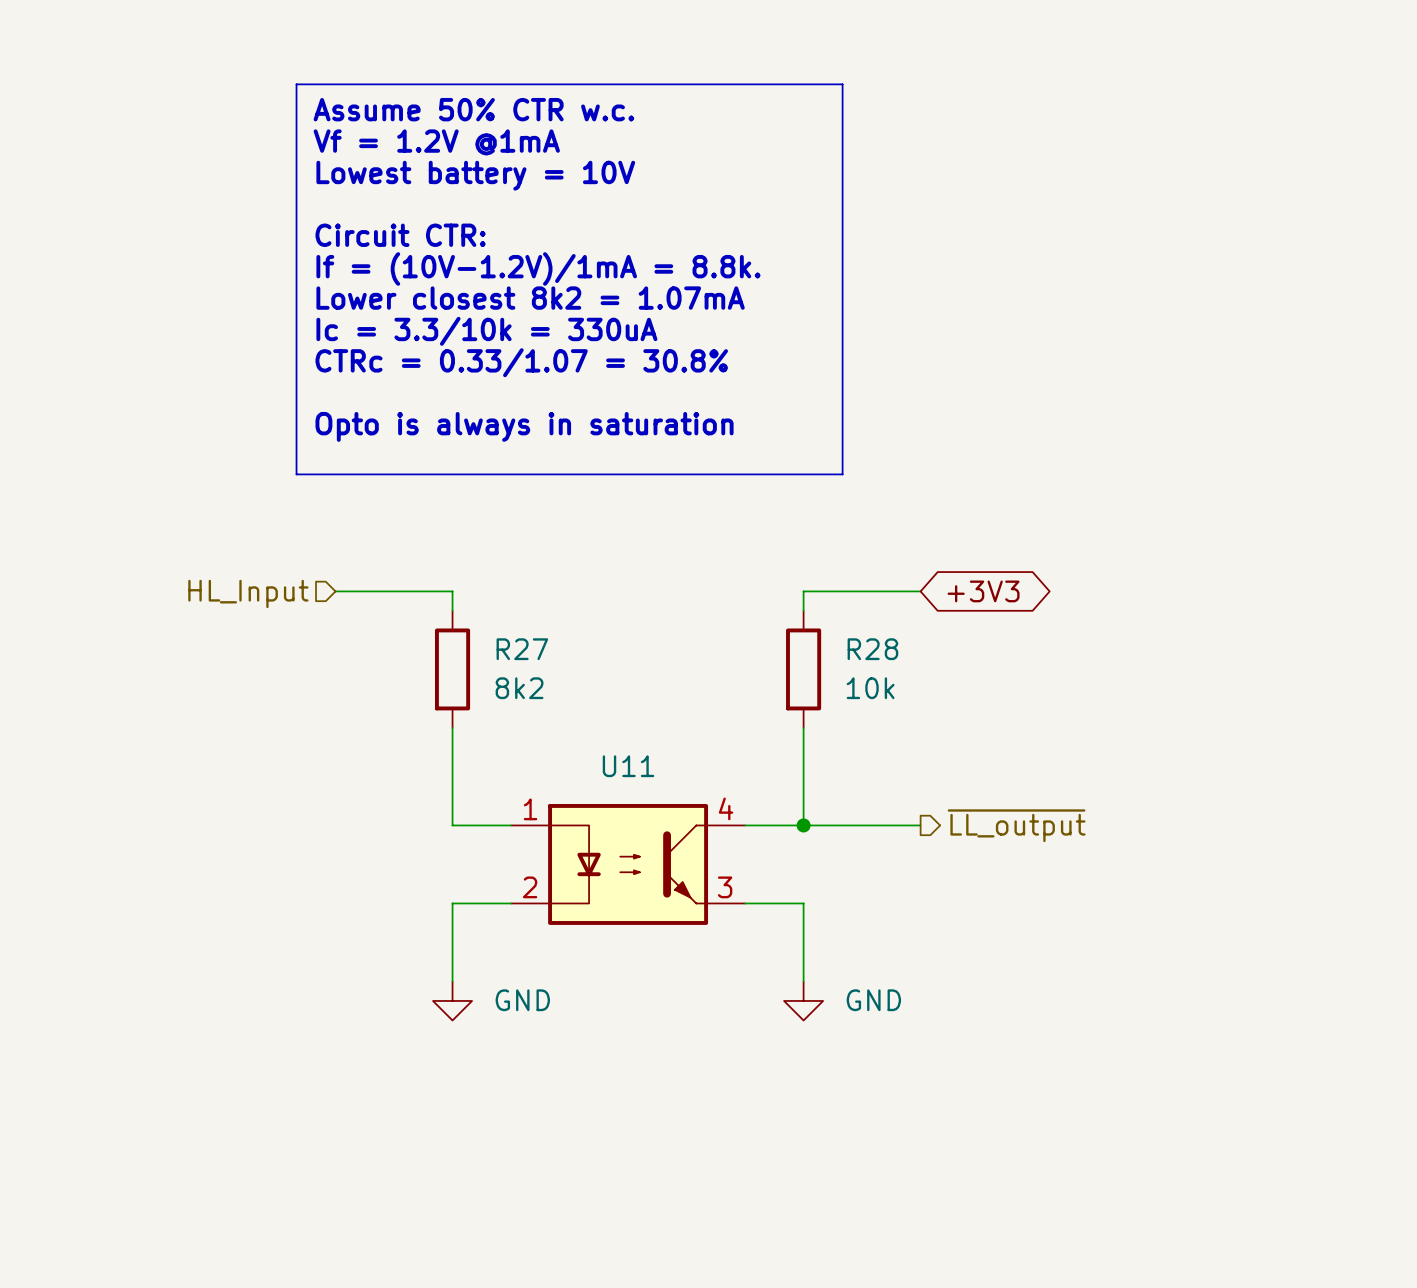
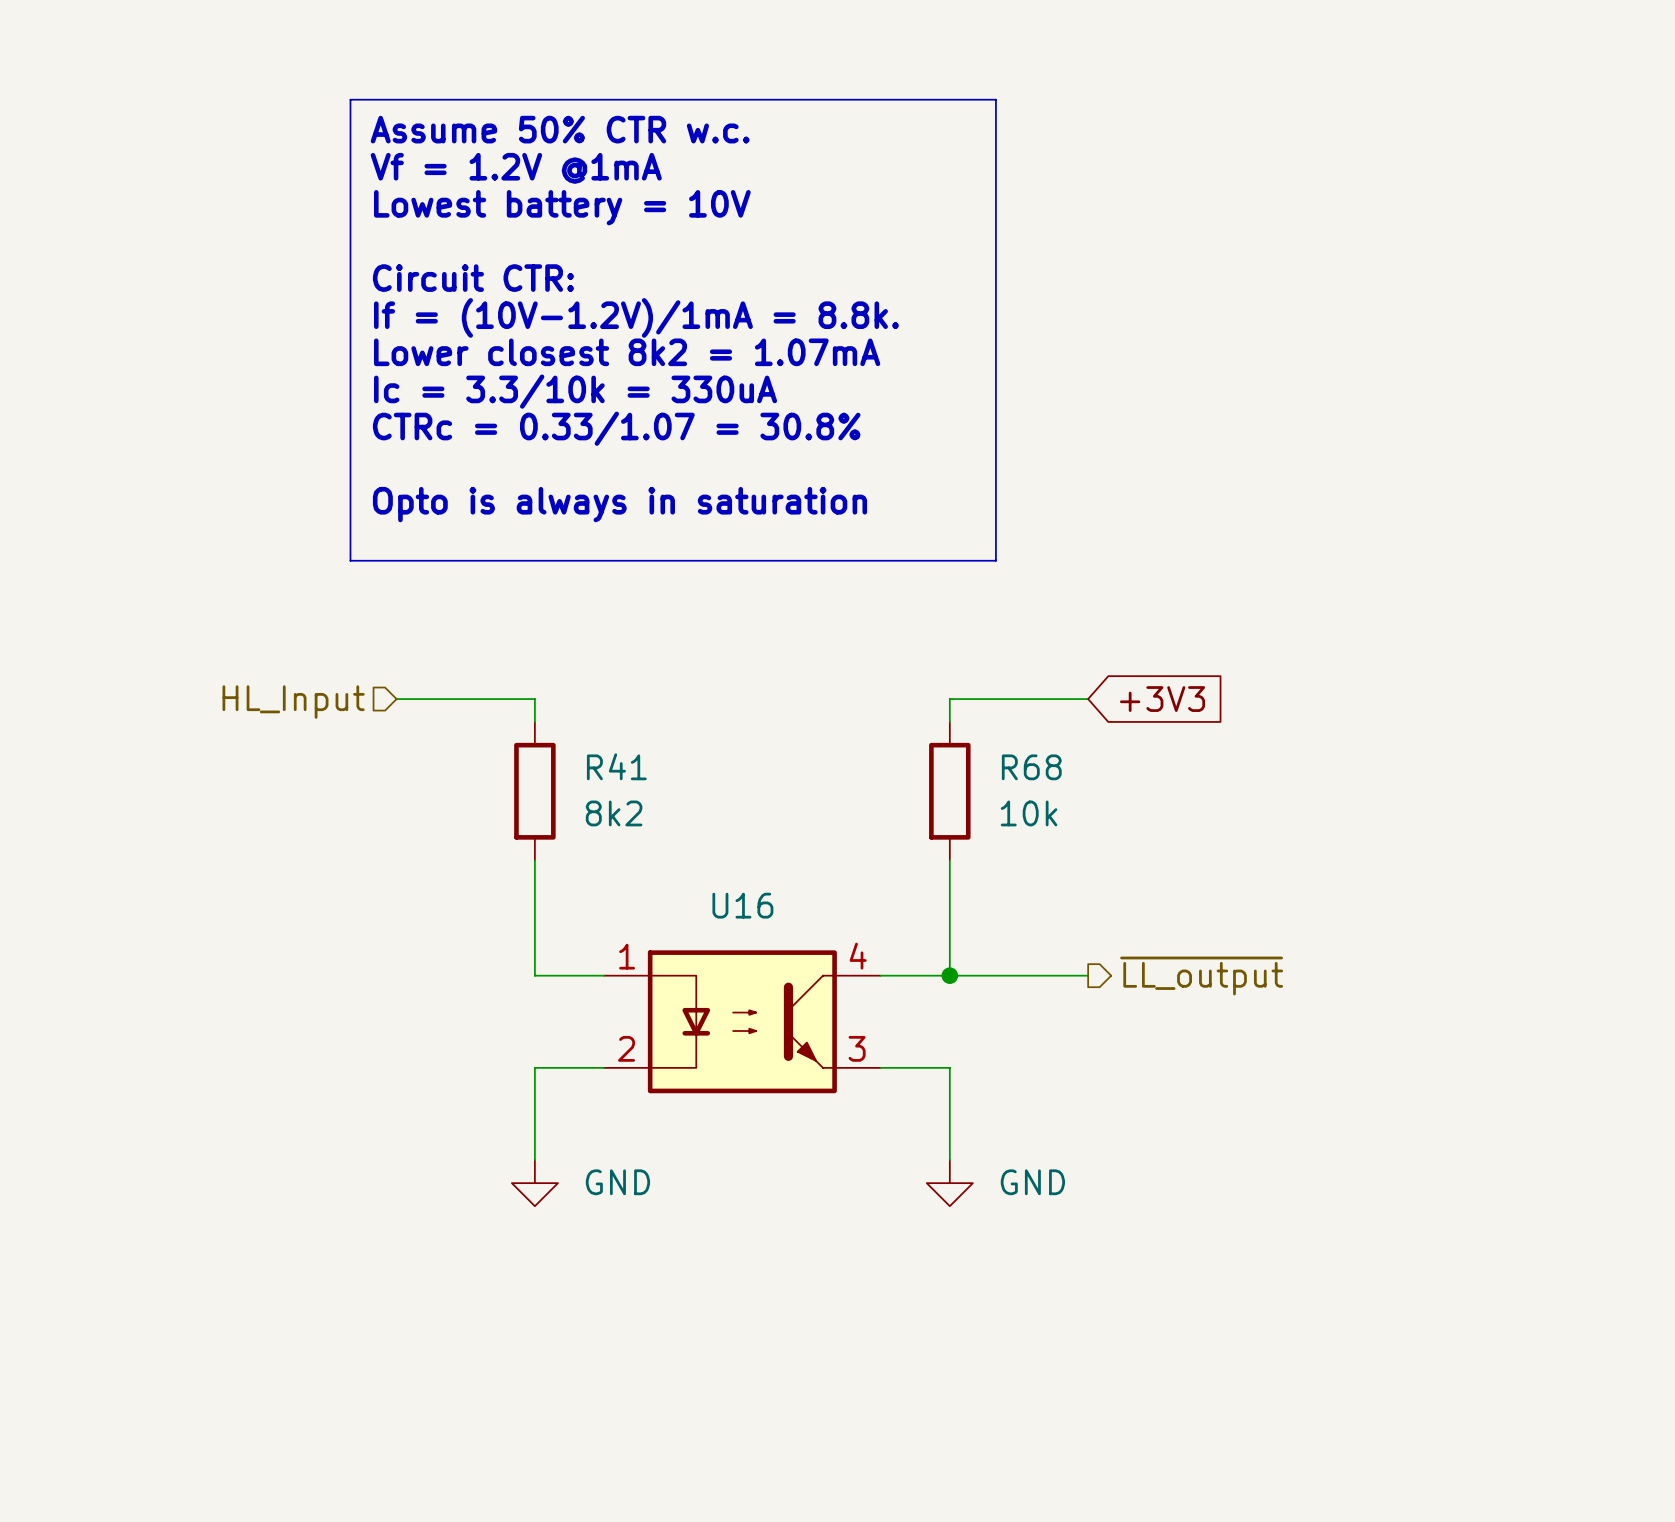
global label shape: bidirectional (983, 591) -> input (1162, 699)
R27 name: R27 (522, 649) -> R41 (616, 766)
R28 name: R28 (872, 649) -> R68 (1031, 767)
U11 name: U11 (628, 766) -> U16 (742, 905)

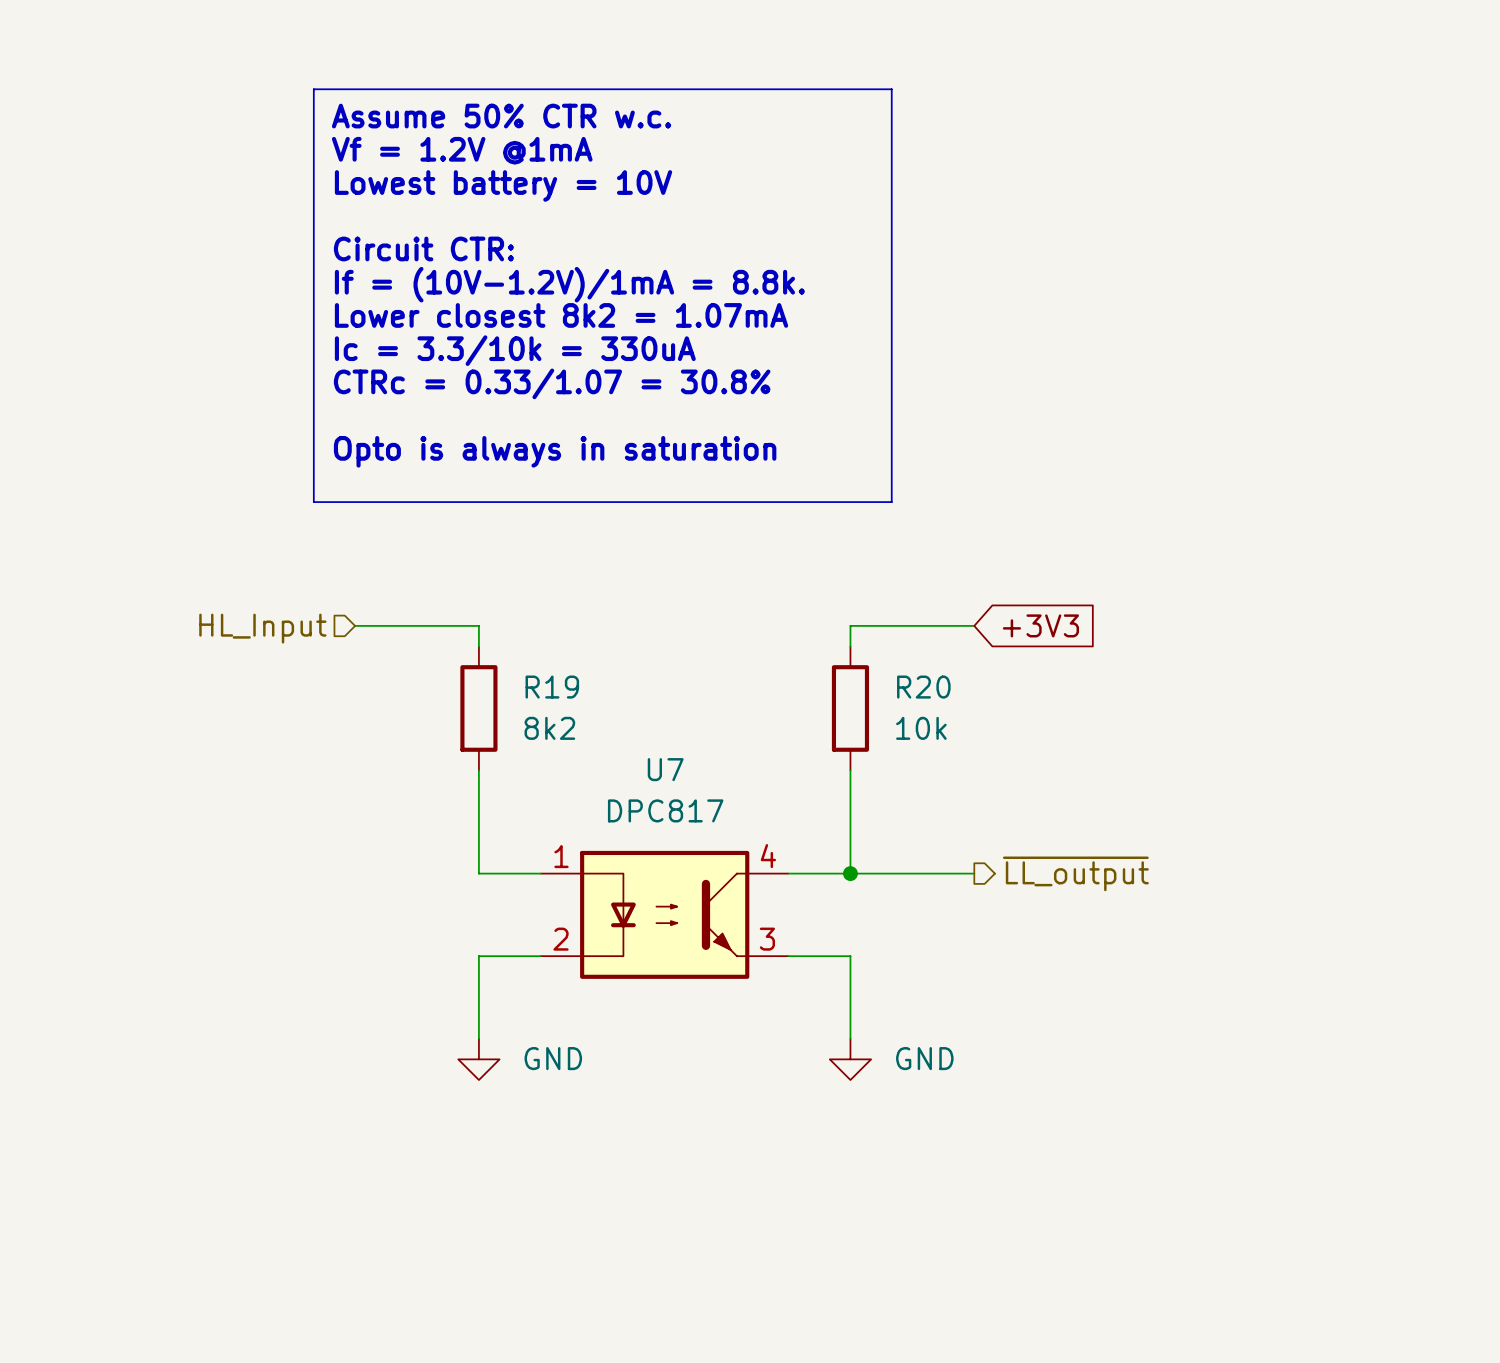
R41 name: R41 (616, 766) -> R19 (552, 687)
R68 name: R68 (1031, 767) -> R20 (923, 687)
U16 name: U16 (742, 905) -> U7 (665, 769)
U16 value: none -> DPC817 (665, 810)

